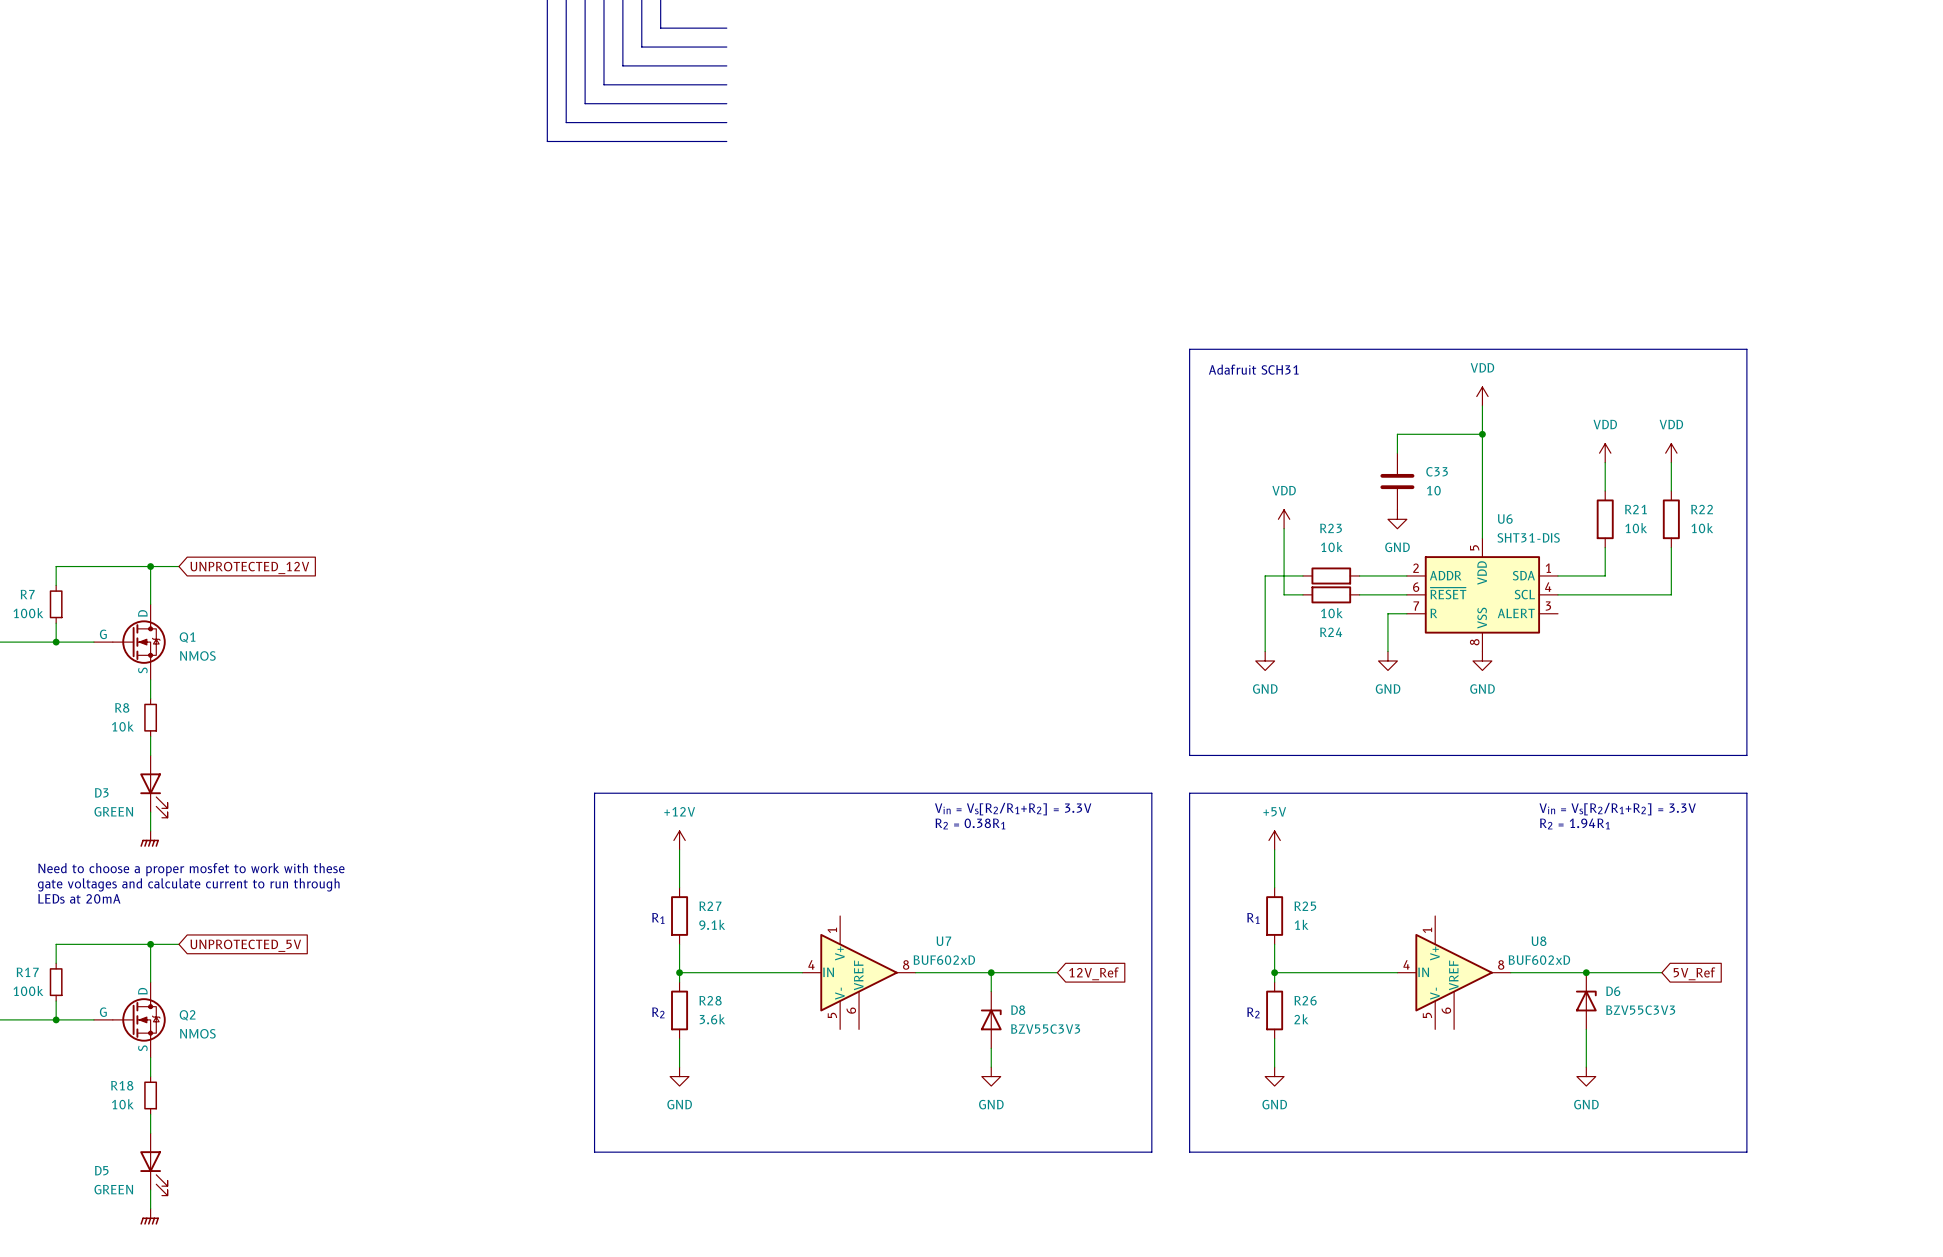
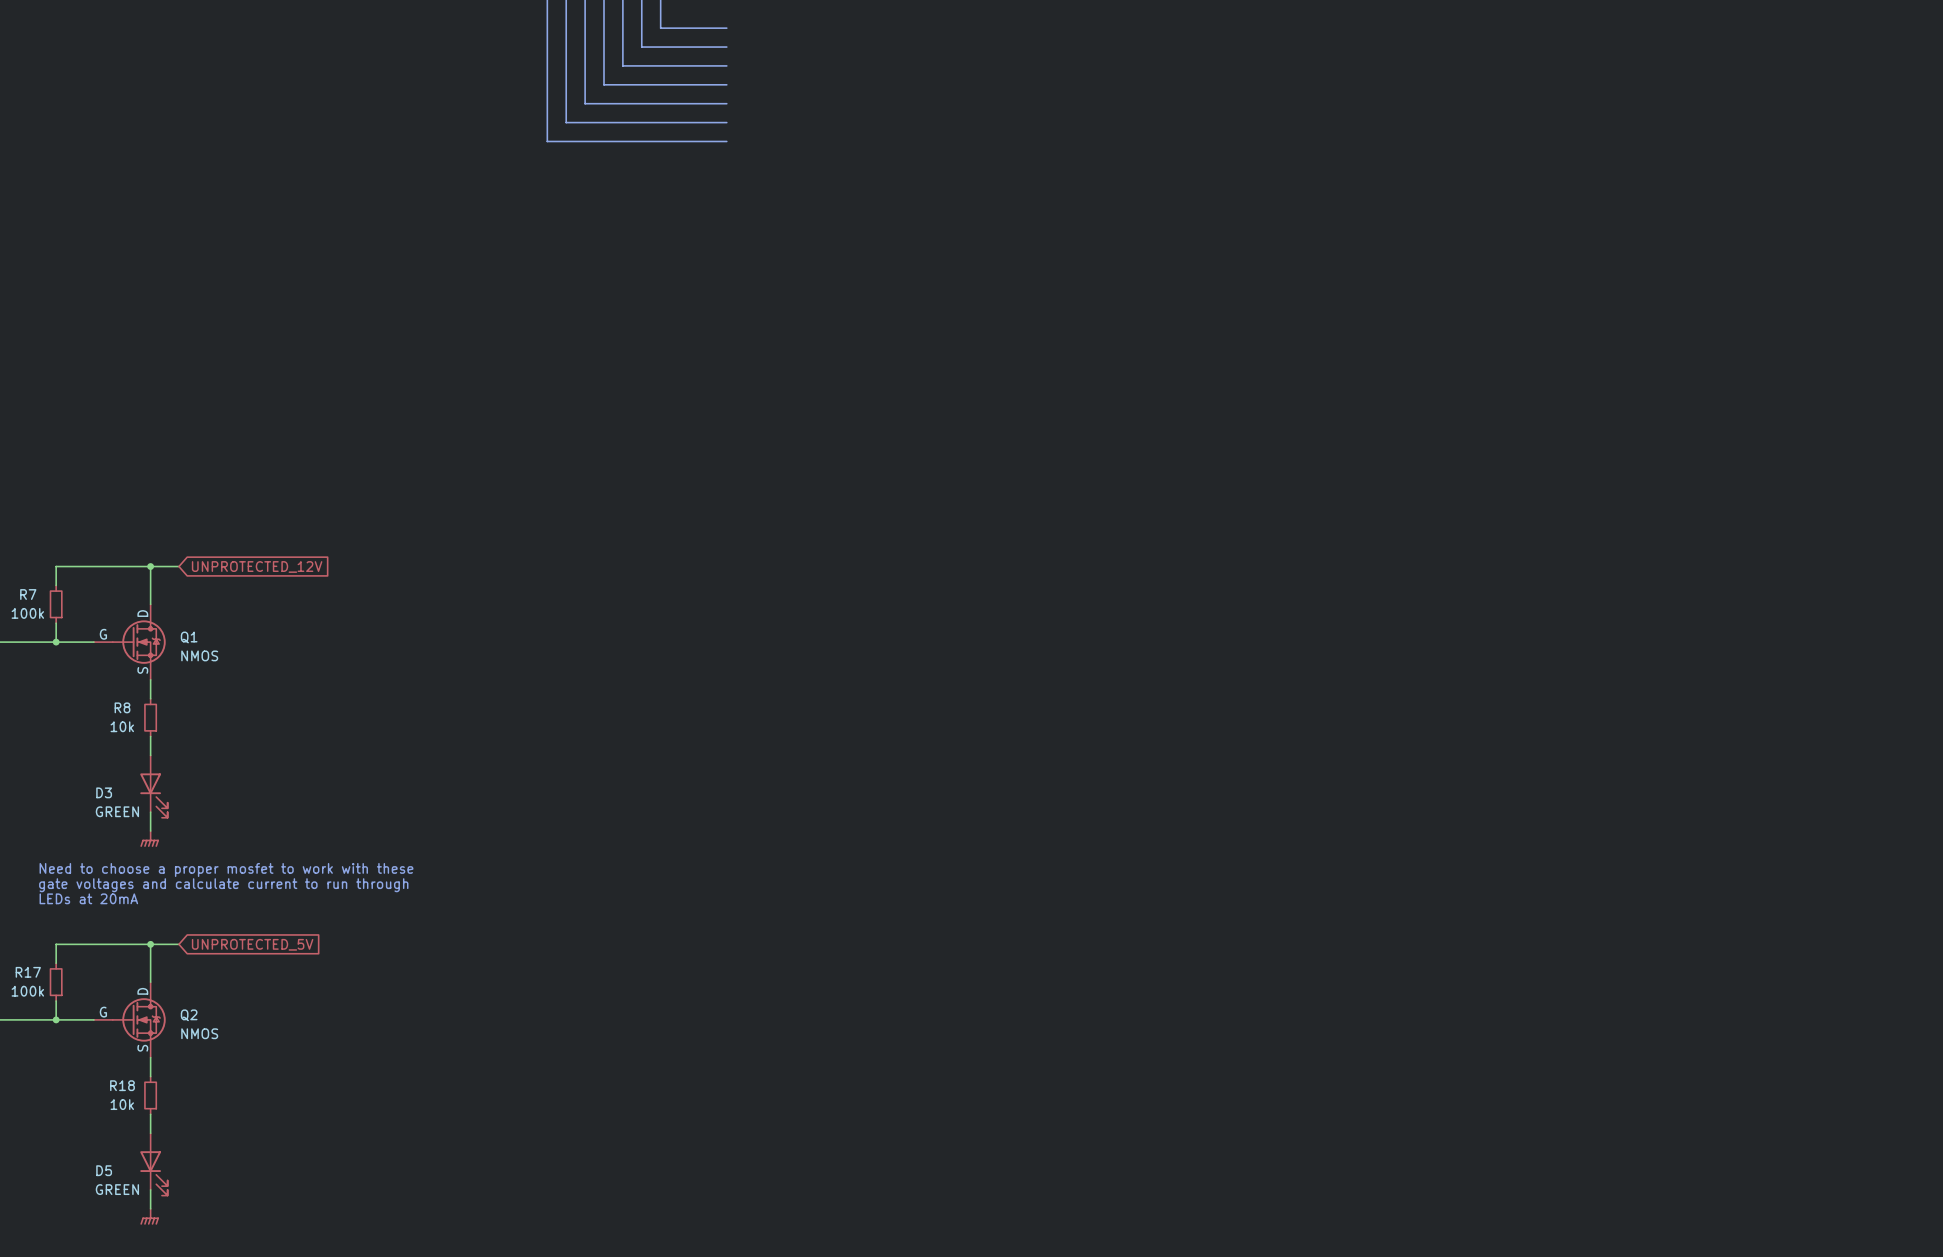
line: (1189, 349) (1746, 349) (1746, 755) (1189, 755) (1189, 349) -> none
text: Adafruit SCH31 (1253, 369) -> none
power symbol: VDD (1482, 396) -> none
wire: (1482, 405) (1482, 538) -> none
wire: (1482, 434) (1397, 434) (1397, 453) -> none
junction: (1482, 434) -> none
power symbol: VDD (1605, 453) -> none
power symbol: VDD (1671, 453) -> none
wire: (1605, 462) (1605, 490) -> none
wire: (1671, 462) (1671, 490) -> none
C33: 10 (1397, 481) -> none
power symbol: VDD (1284, 519) -> none
power symbol: GND (1397, 519) -> none
R21: 10k (1605, 519) -> none
R22: 10k (1671, 519) -> none
wire: (1284, 528) (1284, 594) (1302, 594) -> none
wire: (1605, 547) (1605, 575) (1557, 575) -> none
wire: (1671, 547) (1671, 594) (1557, 594) -> none
wire: (1302, 575) (1265, 575) (1265, 651) -> none
R23: 10k (1331, 575) -> none
wire: (1359, 575) (1406, 575) -> none
R24: 10k (1331, 594) -> none
wire: (1359, 594) (1406, 594) -> none
U6: SHT31-DIS (1482, 594) -> none
wire: (1406, 613) (1387, 613) (1387, 651) -> none
power symbol: GND (1265, 660) -> none
power symbol: GND (1387, 660) -> none
power symbol: GND (1482, 660) -> none
line: (594, 793) (1151, 793) (1151, 1152) (594, 1152) (594, 793) -> none
line: (1189, 793) (1746, 793) (1746, 1152) (1189, 1152) (1189, 793) -> none
text: Vin = Vs[R2/R1+R2] = 3.3V (1013, 809) -> none
text: Vin = Vs[R2/R1+R2] = 3.3V (1617, 809) -> none
text: R2 = 0.38R1 (970, 823) -> none
text: R2 = 1.94R1 (1574, 823) -> none
power symbol: +12V (679, 840) -> none
power symbol: +5V (1274, 840) -> none
wire: (679, 849) (679, 887) -> none
wire: (1274, 849) (1274, 887) -> none
R27: 9.1k (679, 916) -> none
R25: 1k (1274, 916) -> none
text: R1 (658, 918) -> none
text: R1 (1253, 918) -> none
wire: (679, 944) (679, 982) -> none
wire: (1274, 944) (1274, 982) -> none
wire: (679, 972) (802, 972) -> none
junction: (679, 972) -> none
U7: BUF602xD (859, 972) -> none
wire: (915, 972) (1057, 972) -> none
wire: (991, 972) (991, 991) -> none
junction: (991, 972) -> none
wire: (1274, 972) (1397, 972) -> none
junction: (1274, 972) -> none
U8: BUF602xD (1454, 972) -> none
wire: (1510, 972) (1661, 972) -> none
junction: (1586, 972) -> none
global label: 12V_Ref (1094, 973) -> none
global label: 5V_Ref (1694, 973) -> none
D6: BZV55C3V3 (1586, 1001) -> none
R28: 3.6k (679, 1010) -> none
R26: 2k (1274, 1010) -> none
text: R2 (658, 1012) -> none
text: R2 (1253, 1012) -> none
D8: BZV55C3V3 (991, 1019) -> none
wire: (1586, 1029) (1586, 1067) -> none
wire: (679, 1038) (679, 1067) -> none
wire: (1274, 1038) (1274, 1067) -> none
wire: (991, 1048) (991, 1067) -> none
power symbol: GND (679, 1076) -> none
power symbol: GND (991, 1076) -> none
power symbol: GND (1274, 1076) -> none
power symbol: GND (1586, 1076) -> none

